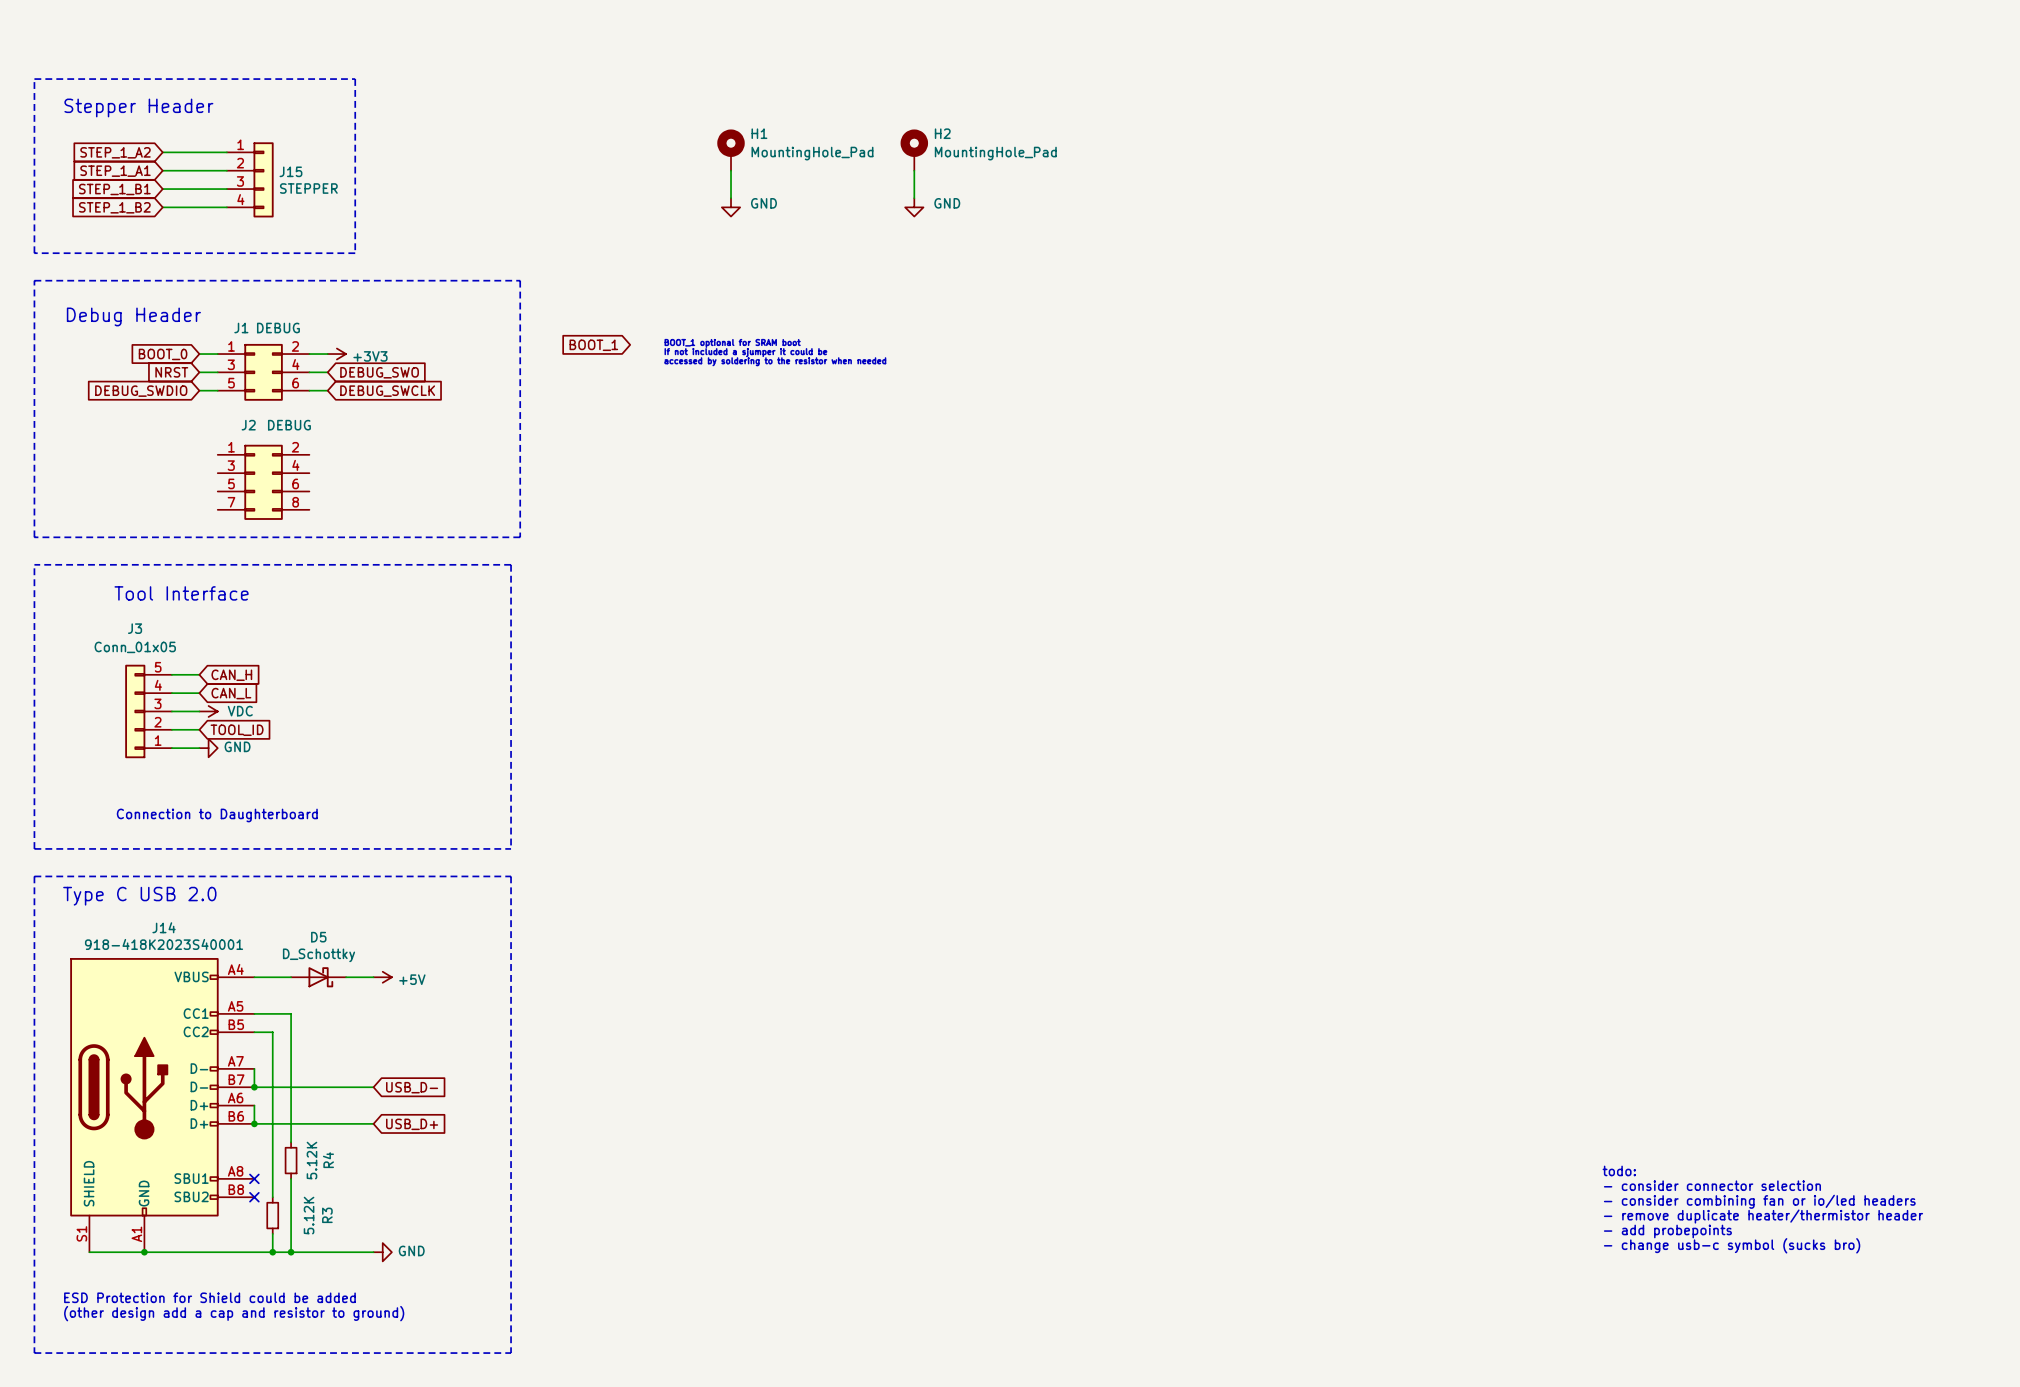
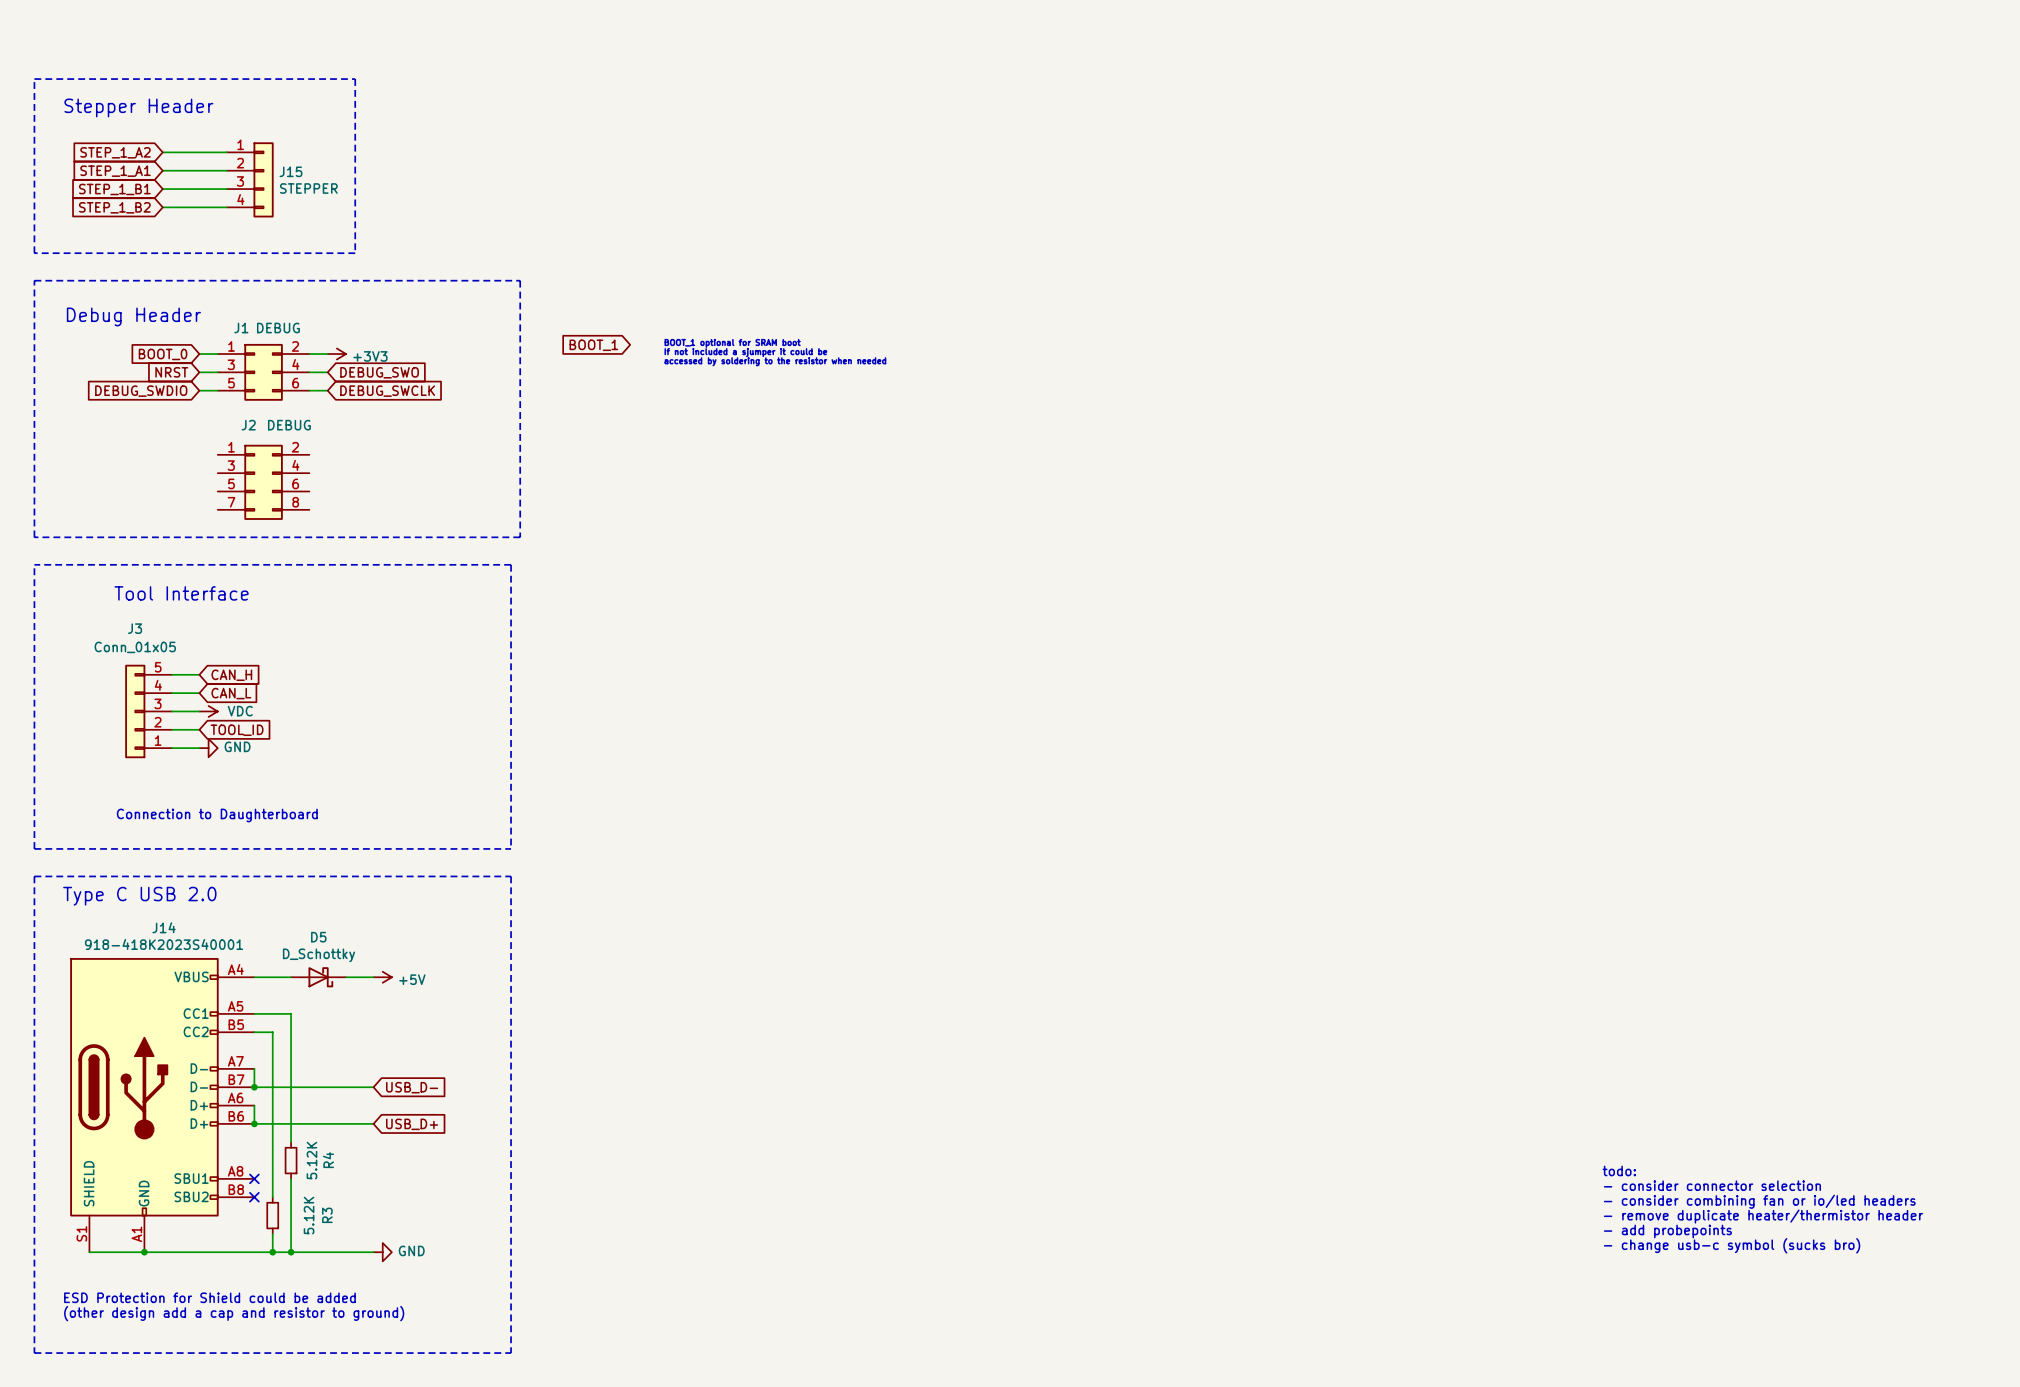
H1: MountingHole_Pad (731, 150) -> none
H2: MountingHole_Pad (914, 150) -> none
wire: (731, 170) (731, 198) -> none
wire: (914, 170) (914, 198) -> none
power symbol: GND (731, 207) -> none
power symbol: GND (914, 207) -> none

